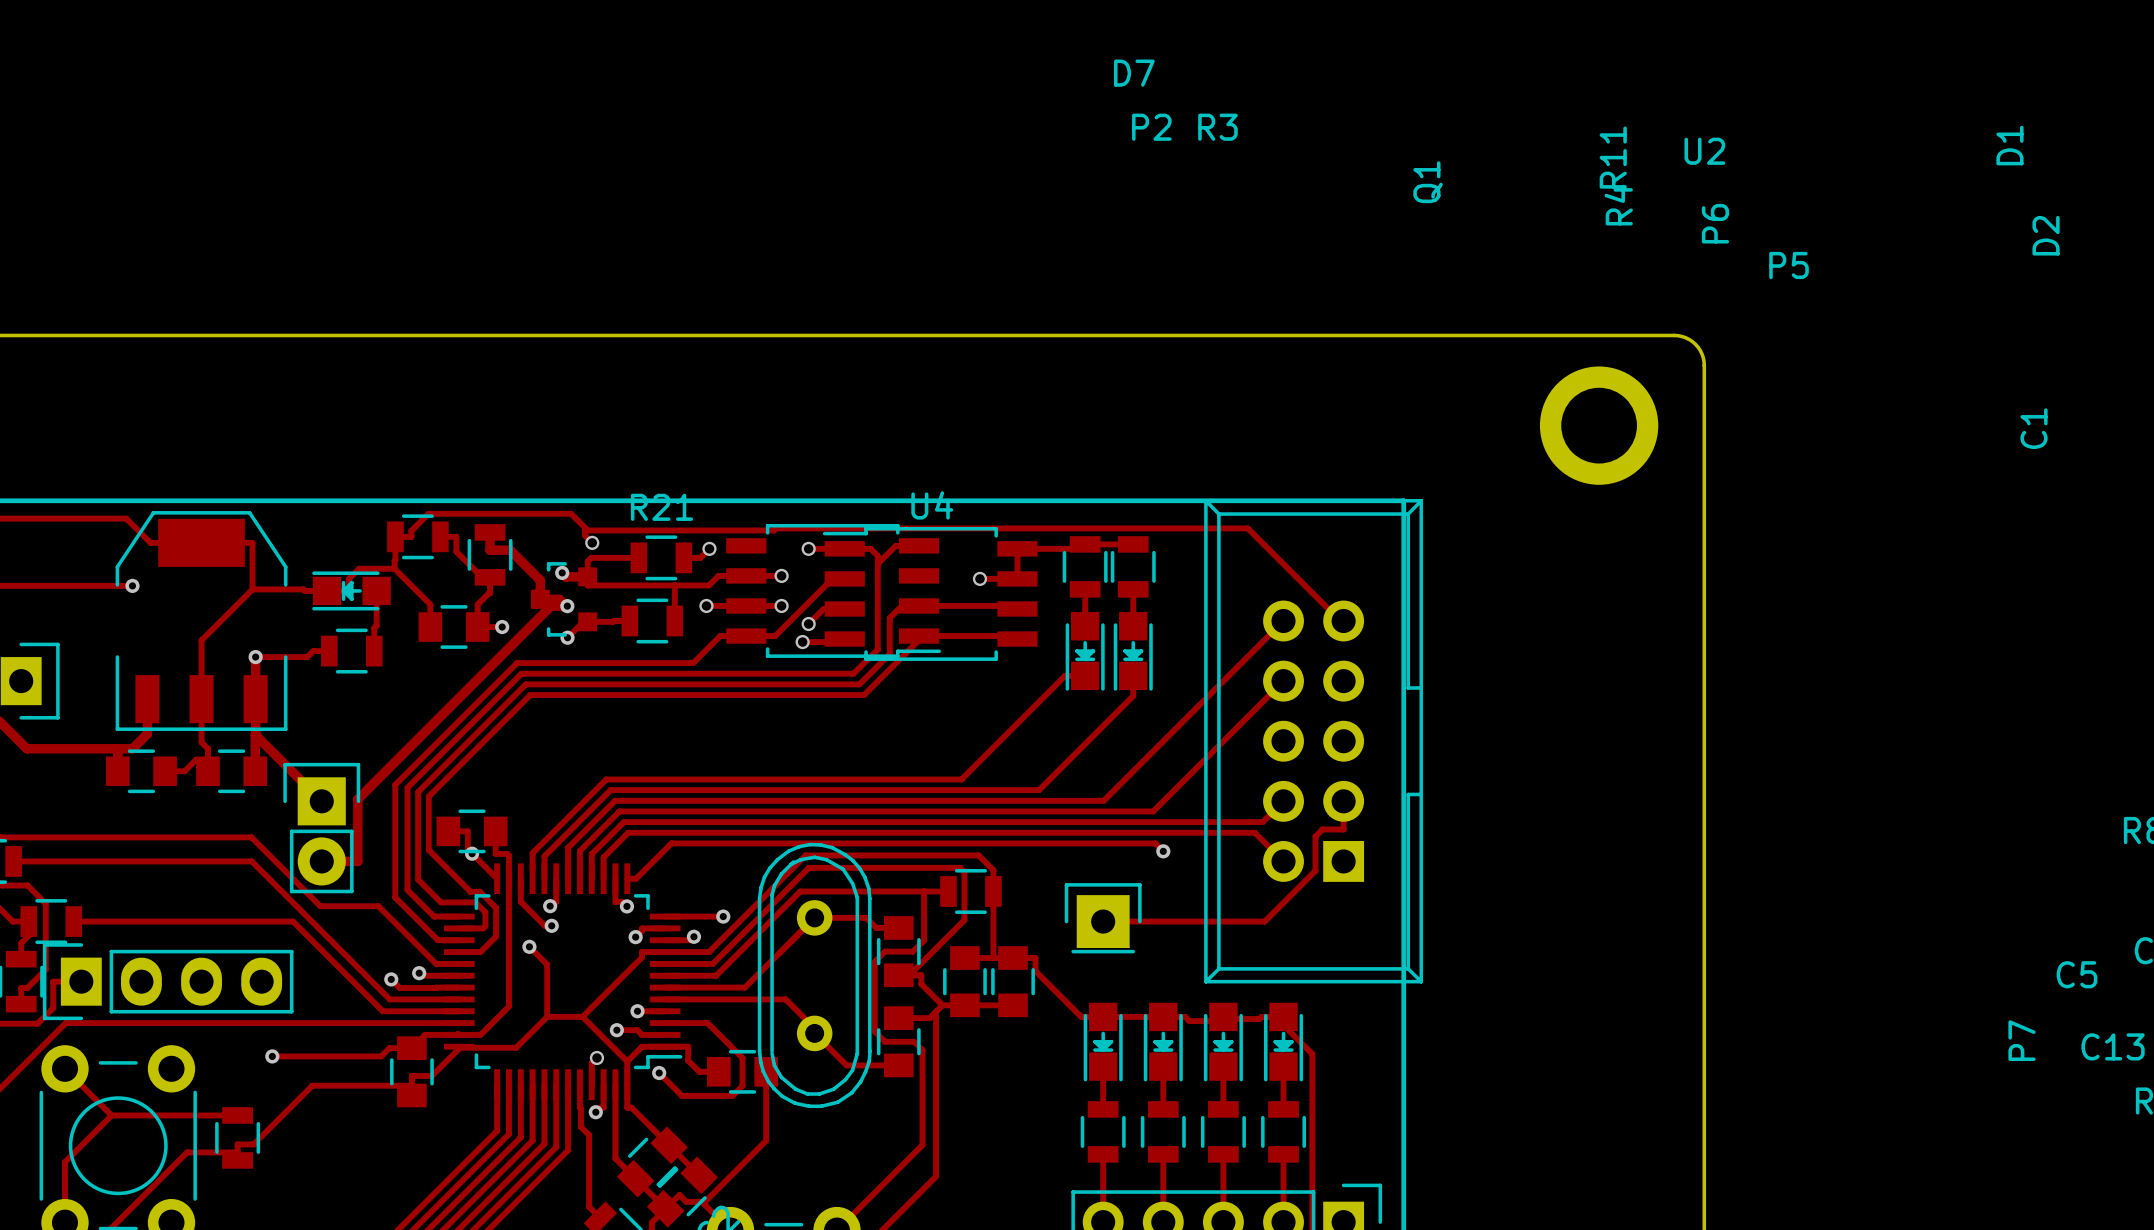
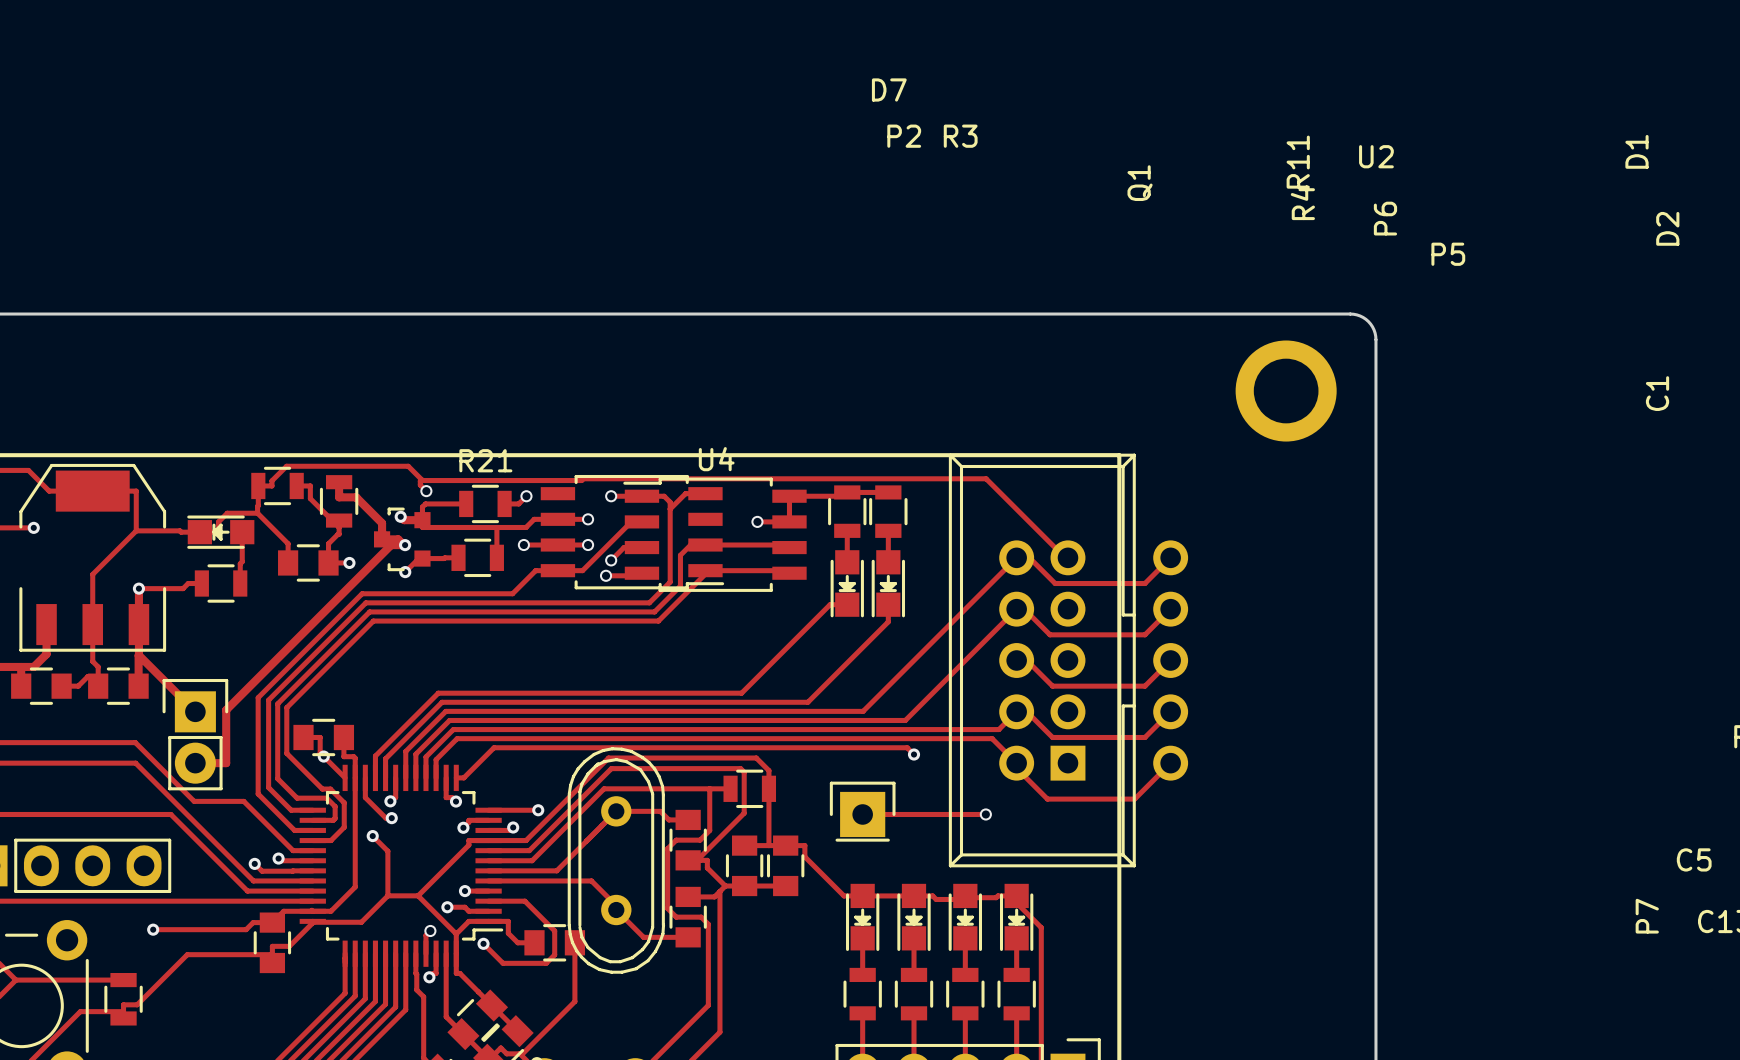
track: none -> (1016, 557) (1029, 557) (1055, 583) (1144, 583) (1170, 557)
part: none -> (1170, 557)
track: none -> (1016, 609) (1024, 609) (1050, 634) (1144, 634) (1170, 609)
part: none -> (1170, 609)
track: none -> (1016, 660) (1026, 660) (1052, 686) (1144, 686) (1170, 660)
part: none -> (1170, 660)
track: none -> (1016, 711) (1026, 711) (1052, 737) (1144, 737) (1170, 711)
track: (1343, 801) (1343, 829) (1322, 829) (1315, 836) (1315, 870) (1264, 921) (1247, 921) -> none
part: none -> (1170, 711)
track: none -> (1016, 763) (1016, 768) (1047, 799) (1134, 799) (1170, 763)
part: none -> (1170, 763)
via: none -> (985, 814)

